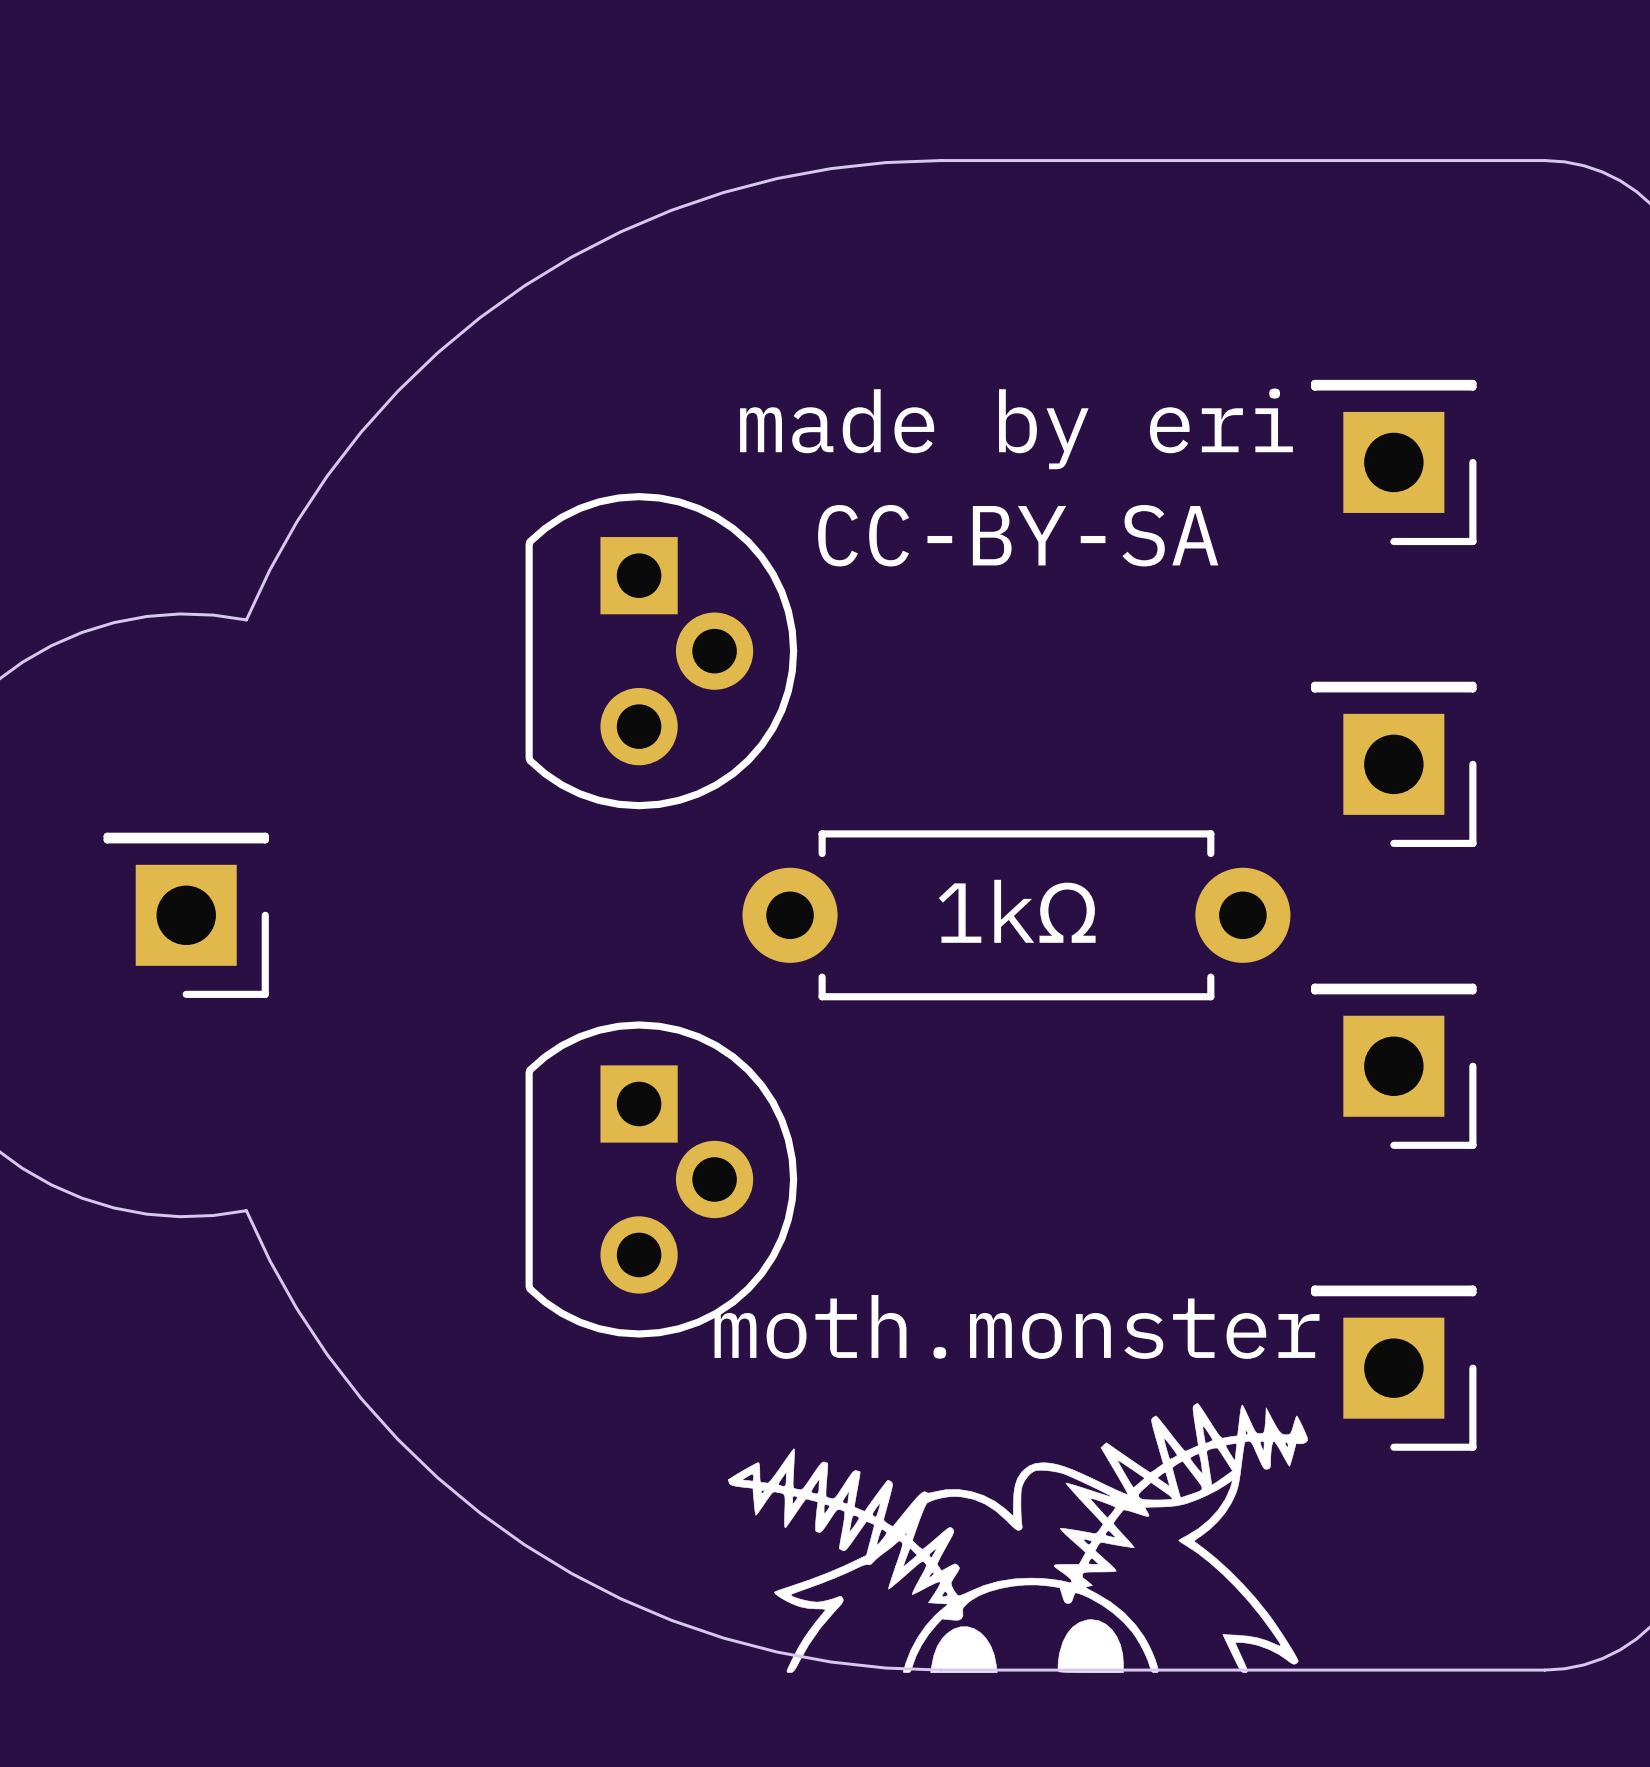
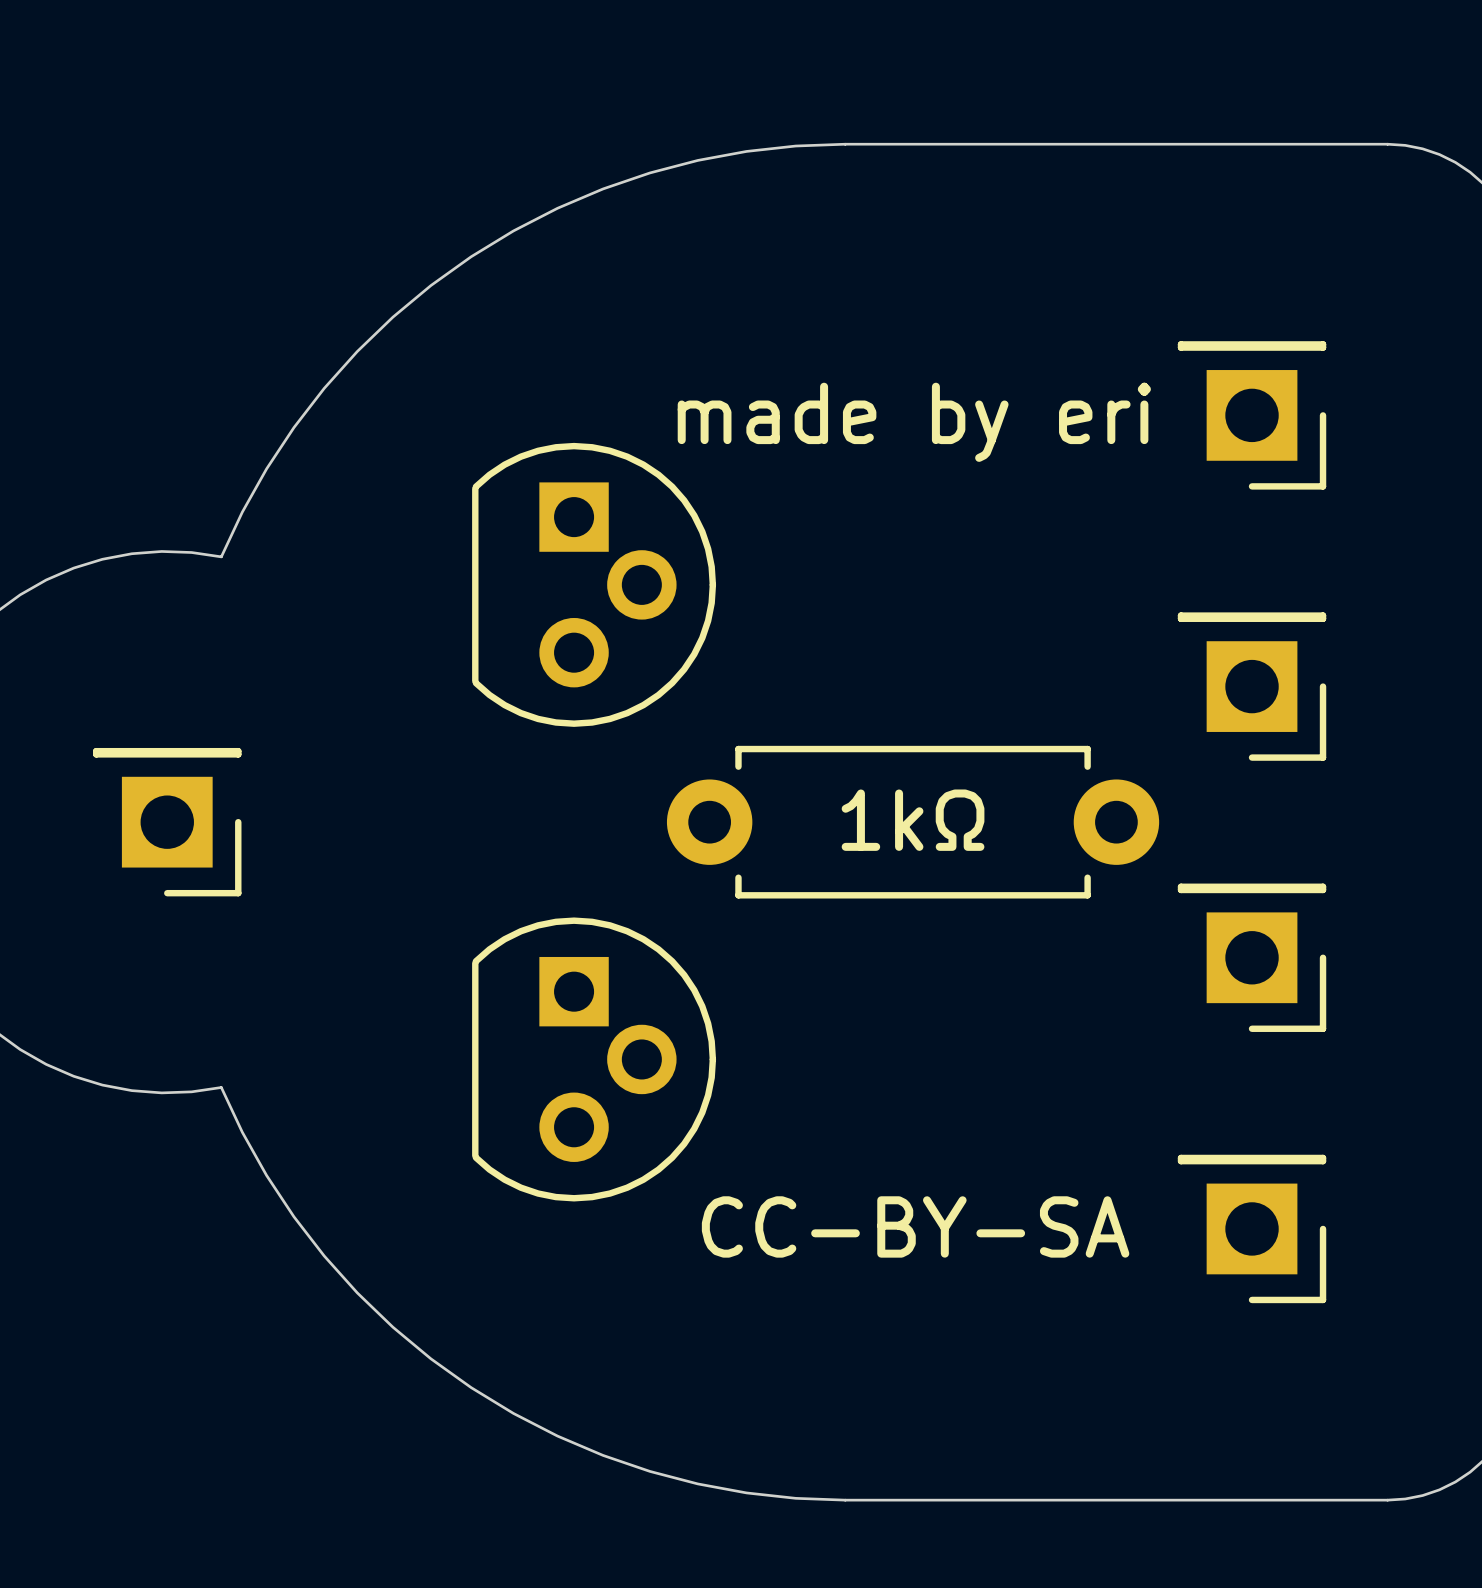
text position: made by eri (1016, 428) -> made by eri (914, 422)
text position: CC-BY-SA (1018, 535) -> CC-BY-SA (915, 1226)
text: moth.monster (1017, 1326) -> none
drawing: [728, 1403, 1308, 1673] -> none

